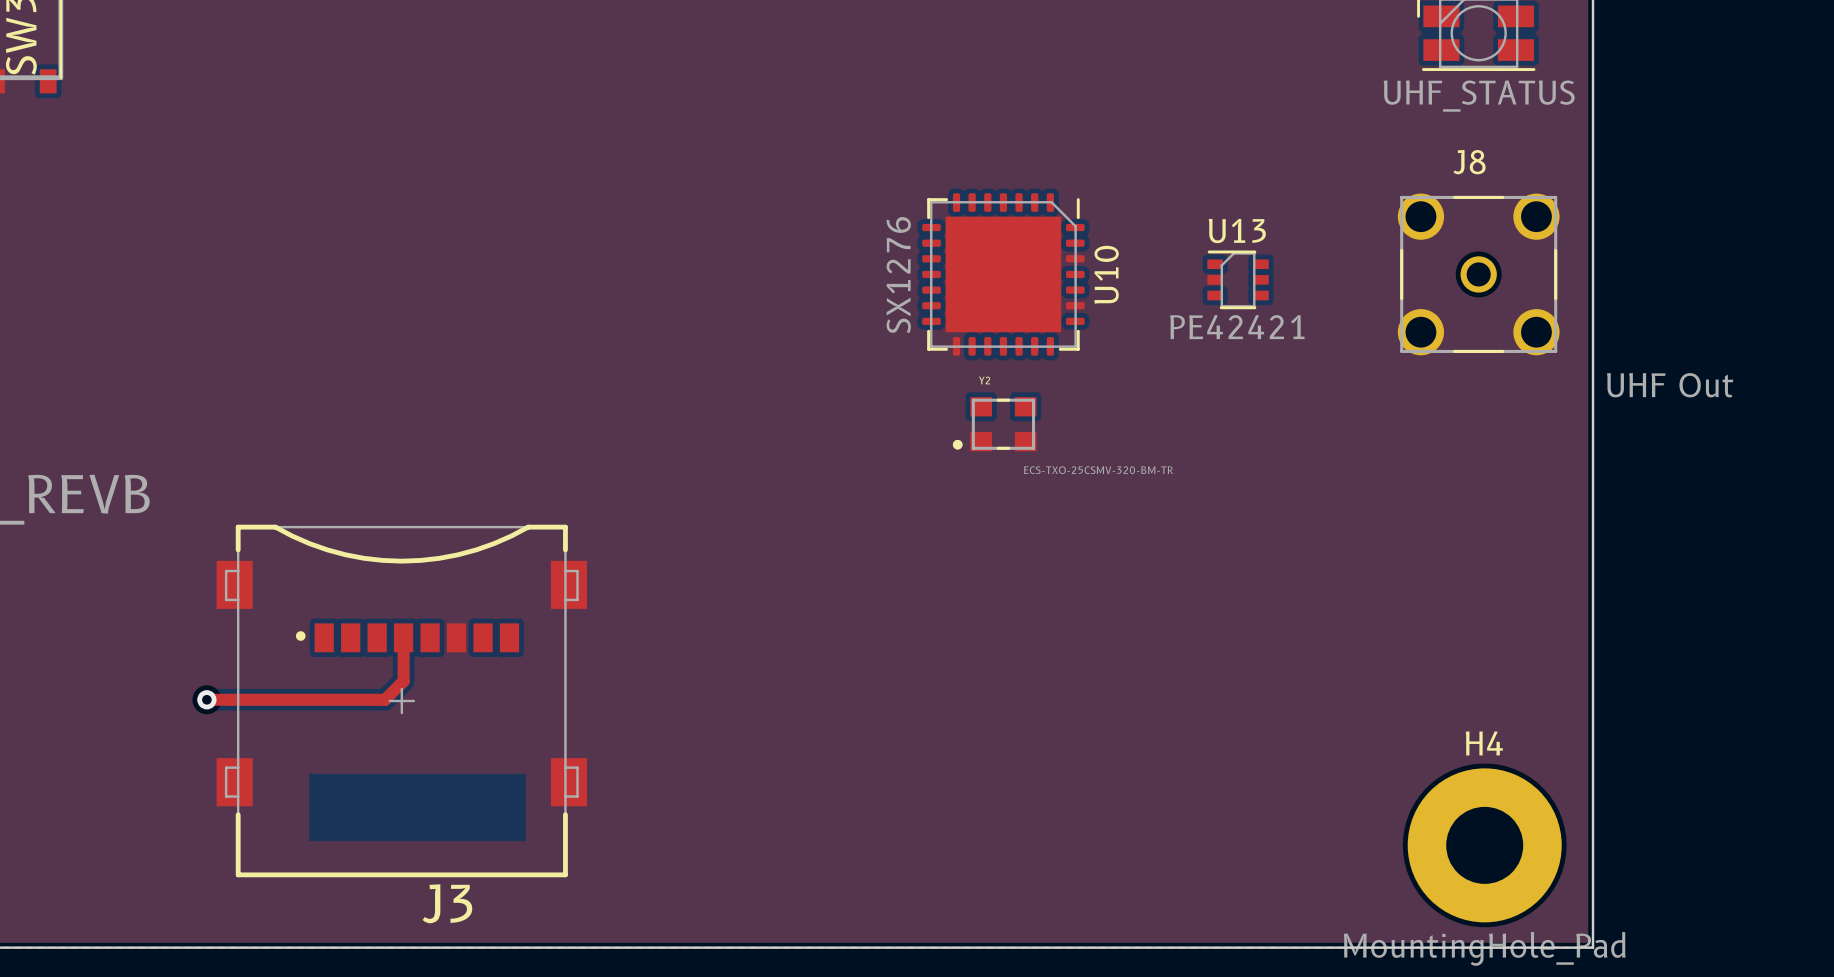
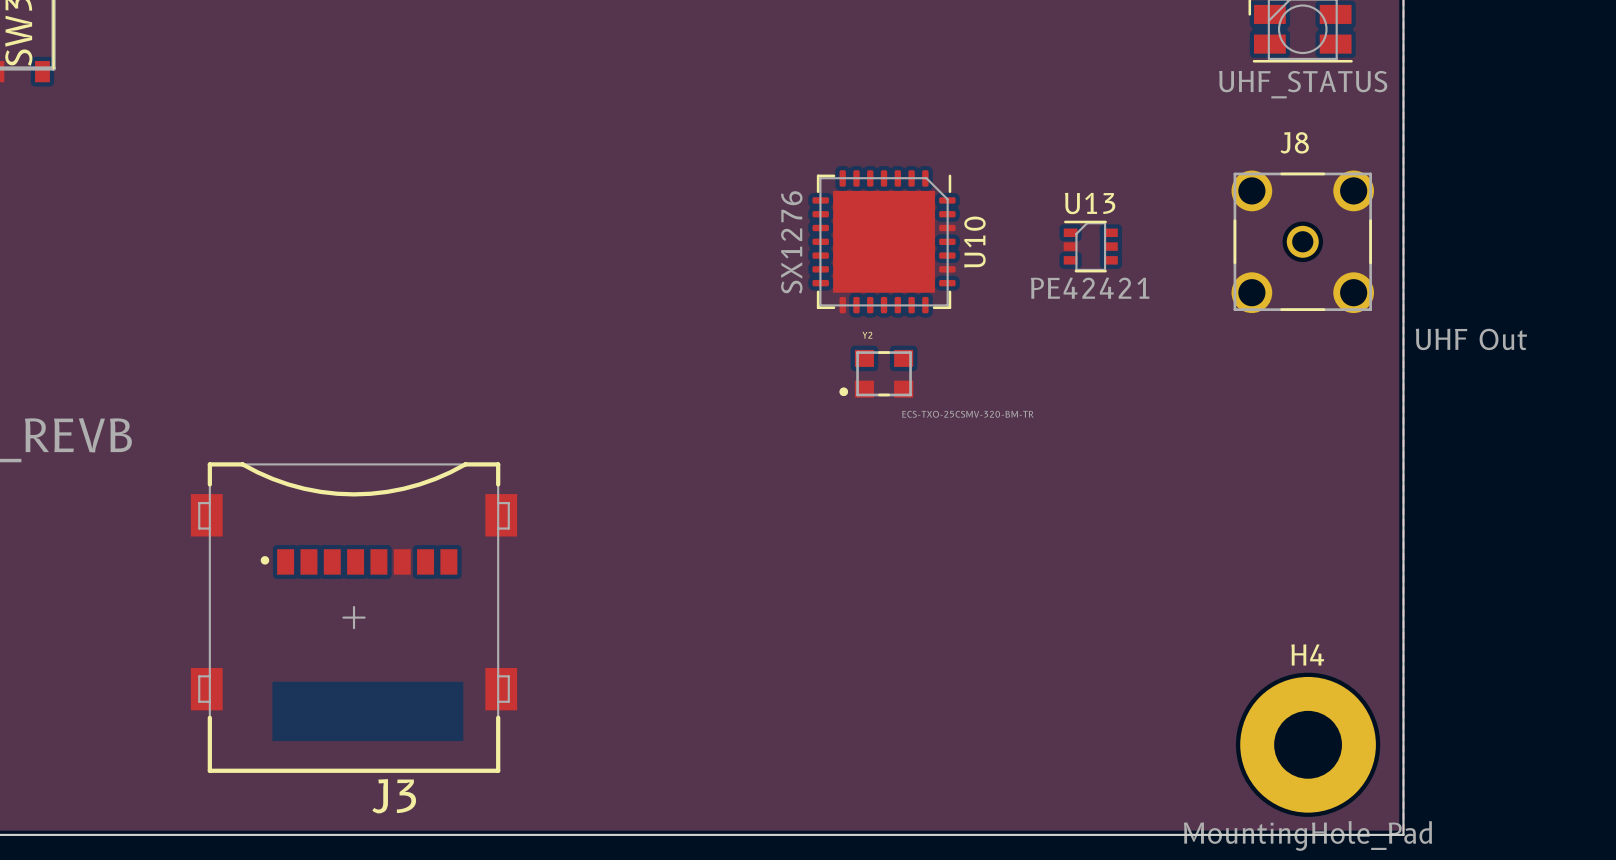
top track: (403, 637) (403, 681) (384, 699) (206, 699) -> none
via: (206, 699) -> none

